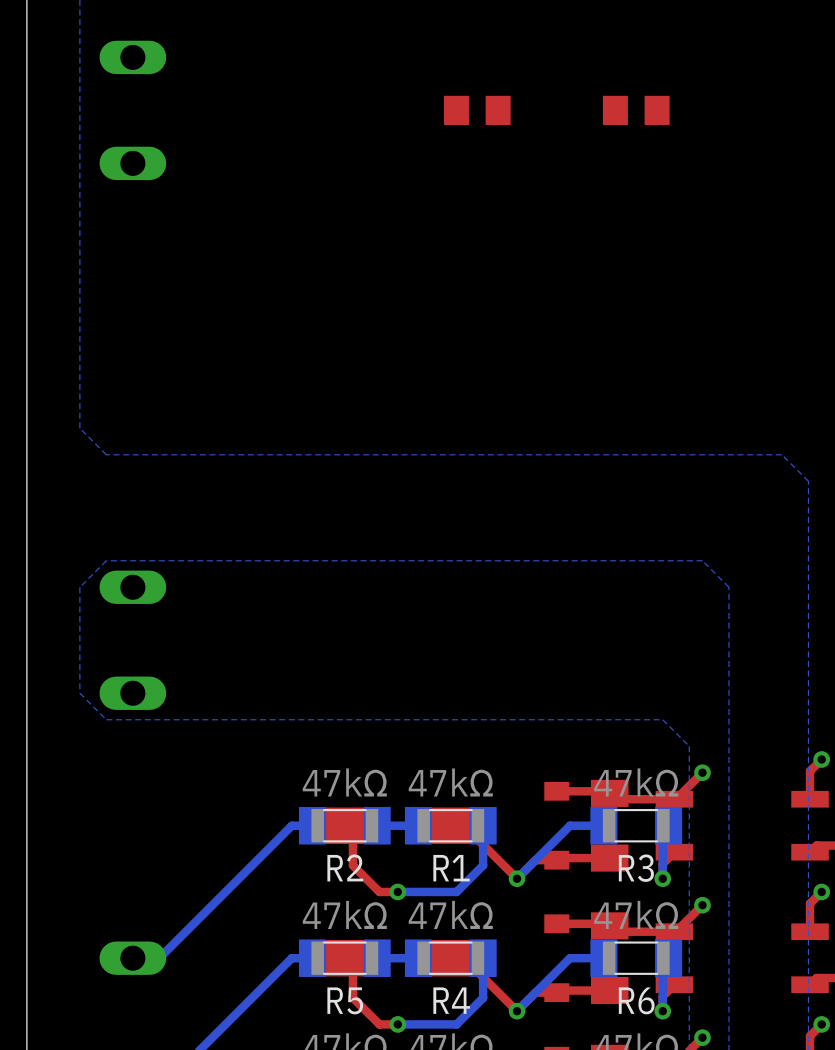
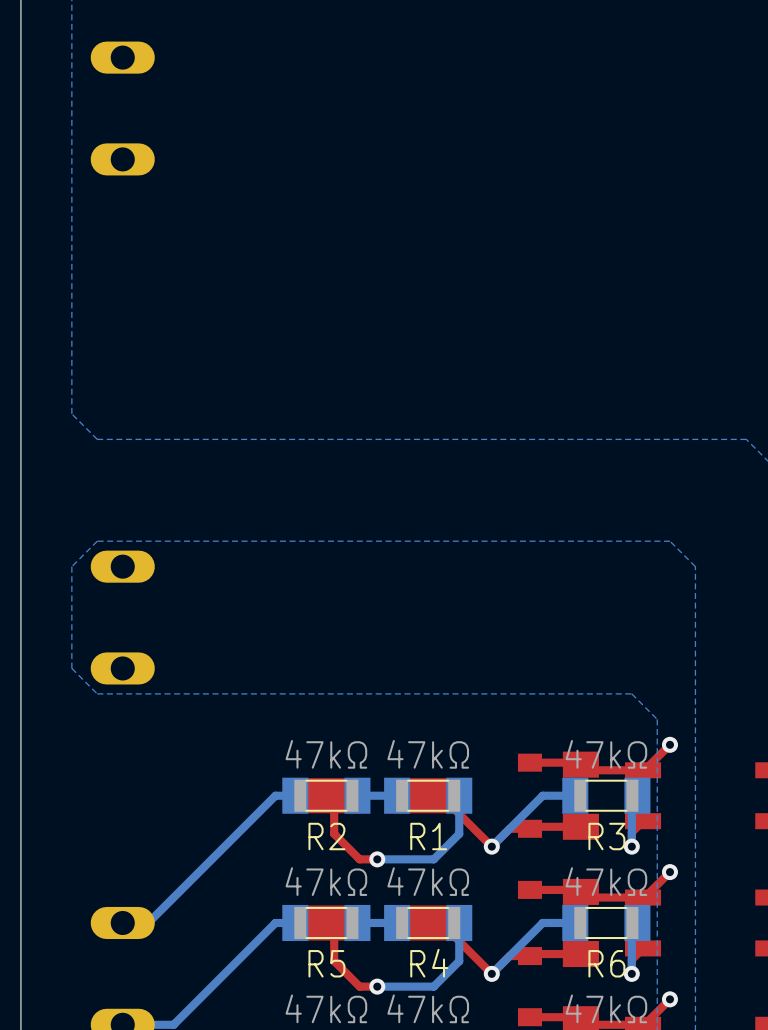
part: (477, 110) -> none
part: (636, 110) -> none

